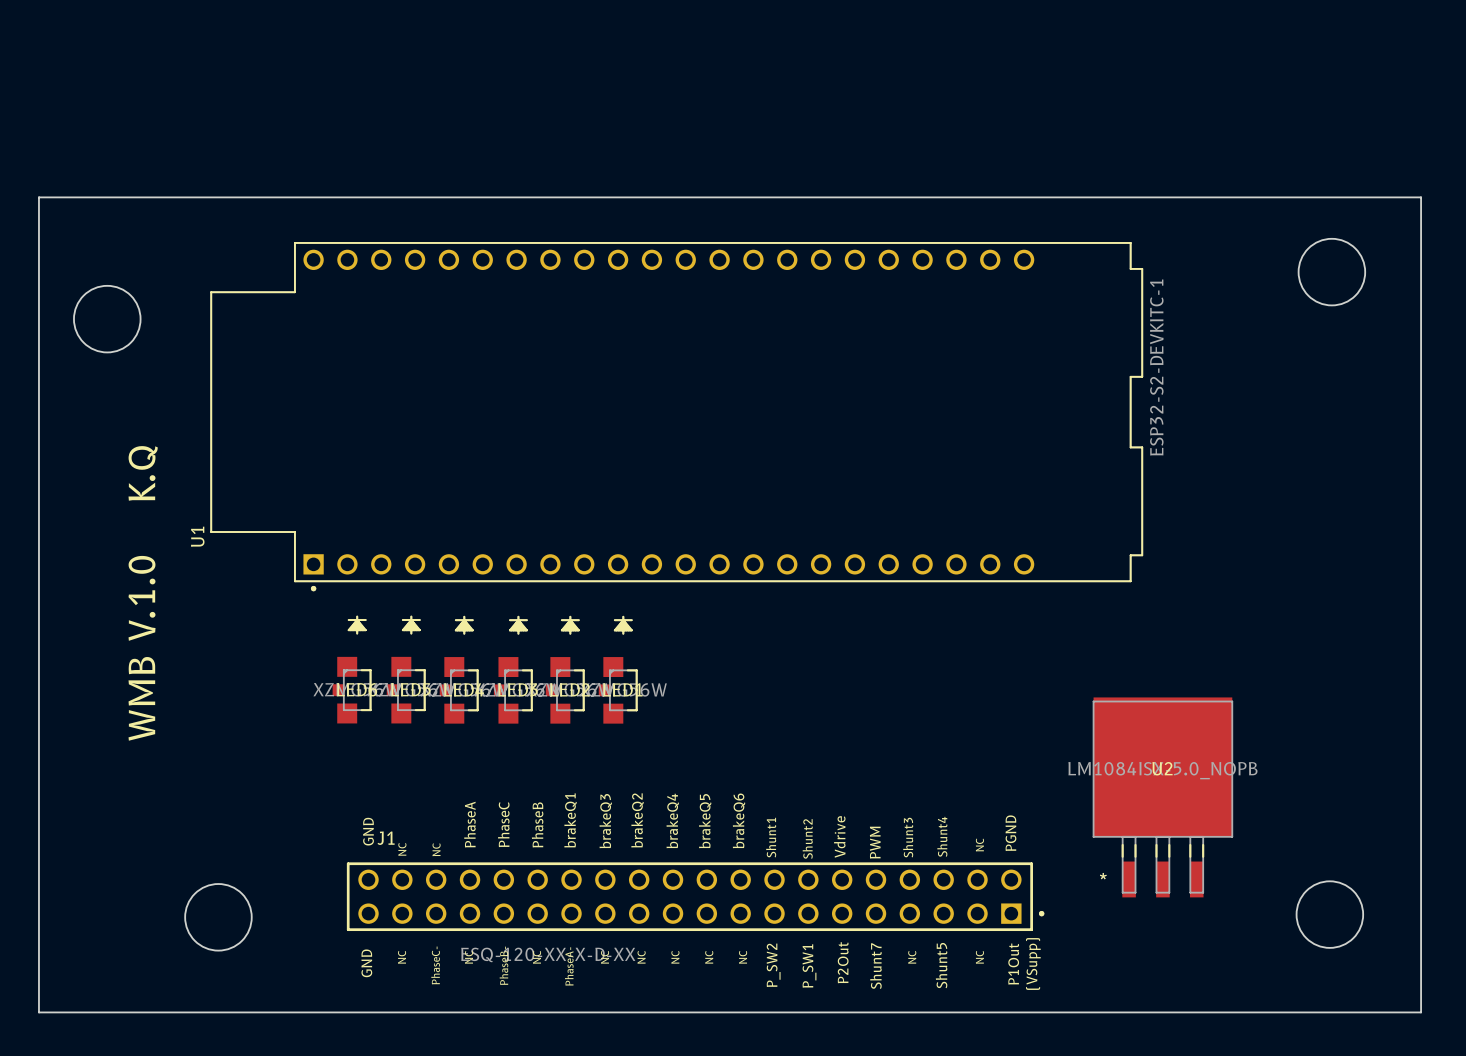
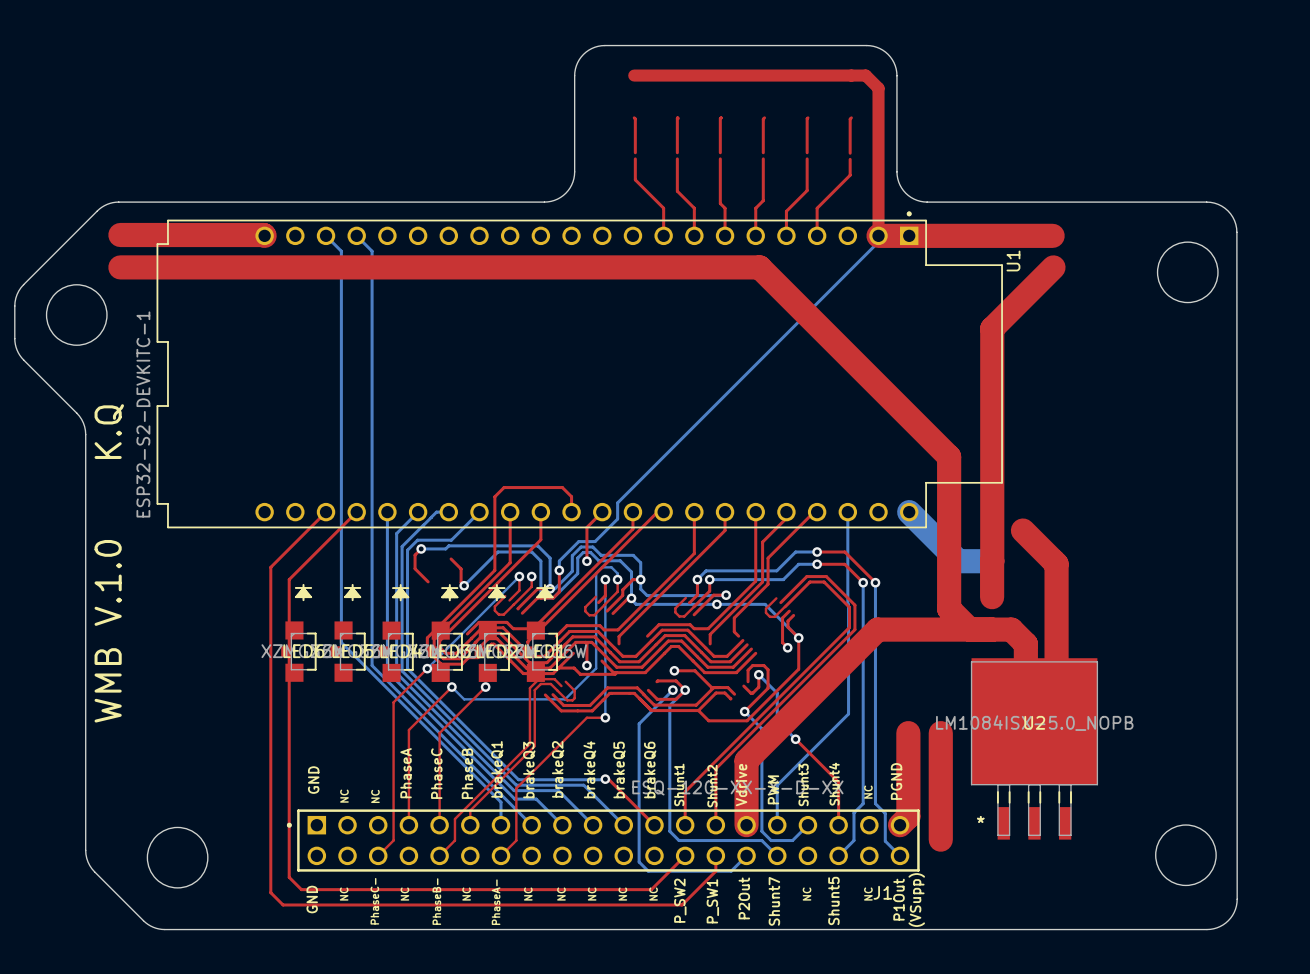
top track: none -> (634, 75) (865, 75) (878, 88) (878, 235) (1052, 235)
top track: none -> (634, 117) (635, 152)
top track: none -> (764, 117) (763, 152)
top track: none -> (807, 117) (807, 152)
top track: none -> (851, 117) (850, 153)
top track: none -> (678, 118) (677, 152)
top track: none -> (721, 118) (720, 152)
top track: none -> (635, 158) (635, 179) (663, 208) (663, 235)
top track: none -> (677, 158) (677, 191) (694, 208) (694, 235)
top track: none -> (720, 158) (720, 203) (725, 208) (725, 235)
top track: none -> (763, 158) (763, 200) (755, 208) (755, 235)
top track: none -> (807, 158) (807, 190) (786, 211) (786, 235)
top track: none -> (850, 159) (850, 175) (817, 208) (817, 235)
top track: none -> (120, 235) (264, 235)
bottom track: none -> (326, 235) (341, 251) (341, 642) (501, 802) (501, 825)
bottom track: none -> (356, 235) (372, 251) (372, 665) (531, 825) (531, 823)
bottom track: none -> (909, 235) (884, 235) (617, 502) (617, 519) (595, 541) (578, 541) (559, 561) (559, 570)
top track: none -> (120, 267) (759, 267) (949, 456) (949, 608) (969, 629)
top track: none -> (1053, 267) (992, 328) (992, 561)
board edge: (38, 309) (38, 197) (1421, 197) (1421, 1012) (38, 1012) (38, 345) -> (14, 306) (17, 294) (23, 284) (97, 210) (112, 202) (544, 202) (557, 199) (568, 190) (574, 175) (575, 69) (579, 59) (586, 52) (601, 45) (866, 45) (879, 48) (890, 56) (896, 72) (897, 178) (905, 193) (920, 201) (1206, 202) (1221, 206) (1232, 217) (1236, 232) (1237, 899) (1234, 912) (1223, 924) (1206, 929) (164, 929) (153, 927) (143, 920) (94, 871) (86, 858) (85, 430) (79, 416) (21, 357) (17, 350) (14, 338)
U1 rotation: 0° (676, 416) -> 180° (579, 369)
top track: none -> (326, 512) (270, 567) (270, 892) (283, 904) (682, 904) (715, 871) (715, 855)
bottom track: none -> (387, 512) (387, 671) (514, 799) (536, 799) (562, 825)
bottom track: none -> (418, 512) (396, 533) (396, 673) (514, 790) (558, 790) (593, 825)
bottom track: none -> (448, 512) (436, 512) (431, 517)
bottom track: none -> (479, 512) (451, 540) (417, 540) (407, 550) (407, 668) (518, 779) (605, 779)
top track: none -> (510, 512) (510, 562) (434, 638) (434, 649) (443, 658) (459, 658) (475, 642)
top track: none -> (540, 512) (540, 539) (439, 641) (439, 647) (445, 653) (456, 653) (482, 627) (503, 627) (531, 656) (544, 656) (569, 631) (598, 631) (622, 656) (635, 656) (662, 630) (687, 630) (714, 656) (727, 656) (742, 640)
top track: none -> (571, 512) (571, 496) (562, 487) (504, 487) (494, 496) (494, 570) (427, 637) (427, 650) (441, 664) (462, 664) (468, 657) (477, 657) (491, 644) (493, 644) (523, 673) (553, 673) (573, 653)
top track: none -> (602, 512) (586, 527) (586, 561)
top track: none -> (632, 512) (632, 528) (533, 628) (513, 628) (506, 622) (479, 622) (467, 634)
top track: none -> (663, 512) (657, 512) (527, 643)
top track: none -> (694, 512) (694, 553) (617, 629) (604, 629) (599, 625) (566, 625) (556, 636)
top track: none -> (725, 512) (725, 530) (619, 636) (619, 643)
top track: none -> (755, 512) (755, 581) (708, 628) (694, 628) (690, 624) (659, 624) (647, 636)
top track: none -> (786, 512) (786, 518) (762, 542) (762, 582) (710, 634) (710, 643)
top track: none -> (817, 512) (814, 512) (768, 558) (768, 584) (734, 618) (734, 631) (738, 636)
bottom track: none -> (847, 512) (848, 713) (777, 785) (777, 825)
bottom track: none -> (909, 512) (958, 561) (992, 561)
bottom track: none -> (431, 517) (423, 525)
top track: none -> (362, 518) (356, 512) (289, 579) (289, 877) (301, 889) (651, 889) (685, 855)
bottom track: none -> (423, 525) (402, 546) (402, 670) (516, 785) (583, 785) (623, 825)
top track: none -> (1022, 530) (1056, 564) (1056, 686)
top track: none -> (421, 548) (415, 555) (415, 568) (428, 581)
bottom track: none -> (421, 548) (445, 548) (448, 545) (537, 545) (550, 558) (550, 588) (554, 588) (572, 571) (572, 555) (581, 547) (592, 547) (601, 555) (633, 555) (640, 562) (640, 589) (647, 595) (726, 595)
via: none -> (421, 548)
top track: none -> (817, 552) (844, 552) (875, 582)
bottom track: none -> (817, 552) (795, 552) (776, 570) (706, 570) (697, 579)
via: none -> (817, 552)
top track: none -> (451, 558) (461, 568) (461, 582) (464, 585)
via: none -> (586, 561)
top track: none -> (992, 561) (992, 597)
top track: none -> (817, 564) (844, 564) (863, 582)
bottom track: none -> (817, 564) (798, 564) (783, 579) (709, 579)
via: none -> (817, 564)
top track: none -> (559, 570) (559, 592) (553, 598) (537, 598) (522, 613)
via: none -> (559, 570)
top track: none -> (519, 576) (519, 590) (509, 600)
bottom track: none -> (519, 576) (427, 668)
via: none -> (519, 576)
top track: none -> (531, 576) (531, 586) (513, 604)
via: none -> (531, 576)
top track: none -> (605, 579) (605, 595) (598, 602)
bottom track: none -> (605, 579) (605, 717)
via: none -> (605, 579)
bottom track: none -> (617, 579) (617, 573) (611, 567) (602, 567) (596, 573) (596, 668) (565, 699) (464, 699) (451, 687)
via: none -> (617, 579)
top track: none -> (640, 579) (632, 579) (622, 589) (622, 595) (607, 611)
via: none -> (640, 579)
top track: none -> (697, 579) (697, 594) (689, 602)
via: none -> (697, 579)
top track: none -> (709, 579) (709, 591) (693, 606)
via: none -> (709, 579)
top track: none -> (617, 579) (617, 591) (604, 605)
bottom track: none -> (863, 582) (863, 803) (853, 812) (853, 840) (838, 855)
via: none -> (863, 582)
bottom track: none -> (875, 582) (875, 803) (885, 813) (885, 841) (900, 855)
via: none -> (875, 582)
bottom track: none -> (464, 585) (497, 552) (531, 552) (540, 561) (540, 598) (553, 598) (577, 573) (577, 558) (583, 552) (590, 552) (598, 560) (620, 560) (631, 572) (631, 599) (636, 604) (765, 604) (798, 637)
via: none -> (464, 585)
top track: none -> (550, 588) (537, 588) (518, 608)
via: none -> (550, 588)
top track: none -> (726, 595) (713, 595) (694, 614)
via: none -> (726, 595)
top track: none -> (505, 596) (494, 606) (494, 610) (498, 614) (503, 614) (513, 604)
top track: none -> (595, 596) (585, 607) (585, 611) (589, 615) (594, 615) (604, 605)
top track: none -> (631, 598) (628, 598) (612, 613)
via: none -> (631, 598)
top track: none -> (685, 597) (675, 608) (675, 612) (679, 616) (684, 616) (694, 606)
top track: none -> (776, 598) (765, 608) (765, 612) (769, 616) (774, 616) (784, 606)
top track: none -> (780, 602) (806, 576) (826, 576) (854, 605) (854, 629) (715, 768) (715, 825)
via: none -> (716, 604)
top track: none -> (785, 606) (809, 582) (824, 582) (849, 607) (849, 627) (685, 791) (685, 825)
top track: none -> (789, 611) (782, 617) (782, 642) (787, 647)
top track: none -> (793, 615) (787, 621) (787, 627) (798, 637) (798, 669) (747, 720) (708, 720) (698, 710)
via: none -> (798, 637)
top track: none -> (585, 642) (586, 665)
top track: none -> (475, 642) (484, 633) (500, 633) (529, 662) (546, 662) (572, 636) (594, 636) (619, 661) (639, 661) (665, 635) (684, 635) (710, 661) (730, 661) (747, 644)
top track: none -> (480, 646) (488, 638) (497, 638) (526, 668) (550, 668) (575, 642) (591, 642) (616, 667) (642, 667) (668, 641) (681, 641) (707, 667) (733, 667) (751, 649)
via: none -> (787, 647)
top track: none -> (755, 653) (736, 672) (704, 672) (678, 646) (671, 646) (645, 672) (613, 672) (601, 661)
via: none -> (586, 665)
top track: none -> (427, 668) (393, 702) (393, 840) (378, 855)
via: none -> (427, 668)
top track: none -> (558, 668) (574, 668) (580, 674) (615, 674) (616, 672)
top track: none -> (674, 670) (694, 670) (711, 687) (727, 687) (734, 694)
via: none -> (674, 670)
top track: none -> (758, 674) (758, 687) (752, 693) (743, 686)
bottom track: none -> (758, 674) (777, 693) (777, 720) (795, 739)
via: none -> (758, 674)
top track: none -> (565, 681) (574, 690) (574, 698) (572, 700) (567, 700) (550, 683) (540, 683) (534, 690) (534, 746) (470, 810) (470, 825)
top track: none -> (656, 681) (676, 680) (685, 690)
top track: none -> (748, 681) (748, 670) (752, 665) (763, 665) (768, 669) (768, 688) (744, 711)
top track: none -> (561, 686) (554, 679) (538, 679) (529, 688) (529, 744) (454, 819) (454, 840) (439, 855)
top track: none -> (1025, 686) (1025, 644) (1011, 629) (877, 629) (746, 760) (746, 825)
top track: none -> (451, 687) (408, 730) (408, 825)
via: none -> (451, 687)
top track: none -> (485, 687) (439, 733) (439, 825)
via: none -> (485, 687)
top track: none -> (713, 687) (696, 705) (654, 705) (643, 694)
bottom track: none -> (672, 690) (639, 723) (639, 862) (648, 871) (731, 871) (746, 855)
via: none -> (672, 690)
top track: none -> (685, 690) (676, 699) (657, 699) (648, 690)
bottom track: none -> (685, 690) (669, 705) (669, 831) (679, 840) (761, 840) (777, 855)
via: none -> (685, 690)
top track: none -> (545, 694) (561, 710) (592, 710) (609, 693) (634, 693) (651, 710) (698, 710)
top track: none -> (552, 694) (563, 705) (590, 705) (607, 687) (637, 687) (644, 694)
top track: none -> (730, 698) (724, 693) (716, 693) (698, 710)
bottom track: none -> (744, 711) (761, 728) (761, 831) (771, 840) (792, 840) (807, 825)
via: none -> (744, 711)
top track: none -> (605, 717) (586, 717) (516, 788) (516, 840) (501, 855)
via: none -> (605, 717)
top track: none -> (908, 733) (908, 816) (900, 825)
top track: none -> (940, 733) (940, 839)
top track: none -> (795, 739) (838, 782) (838, 825)
via: none -> (795, 739)
top track: none -> (605, 779) (608, 779) (654, 825)
via: none -> (605, 779)
J1 rotation: 0° (695, 896) -> 180° (603, 840)

